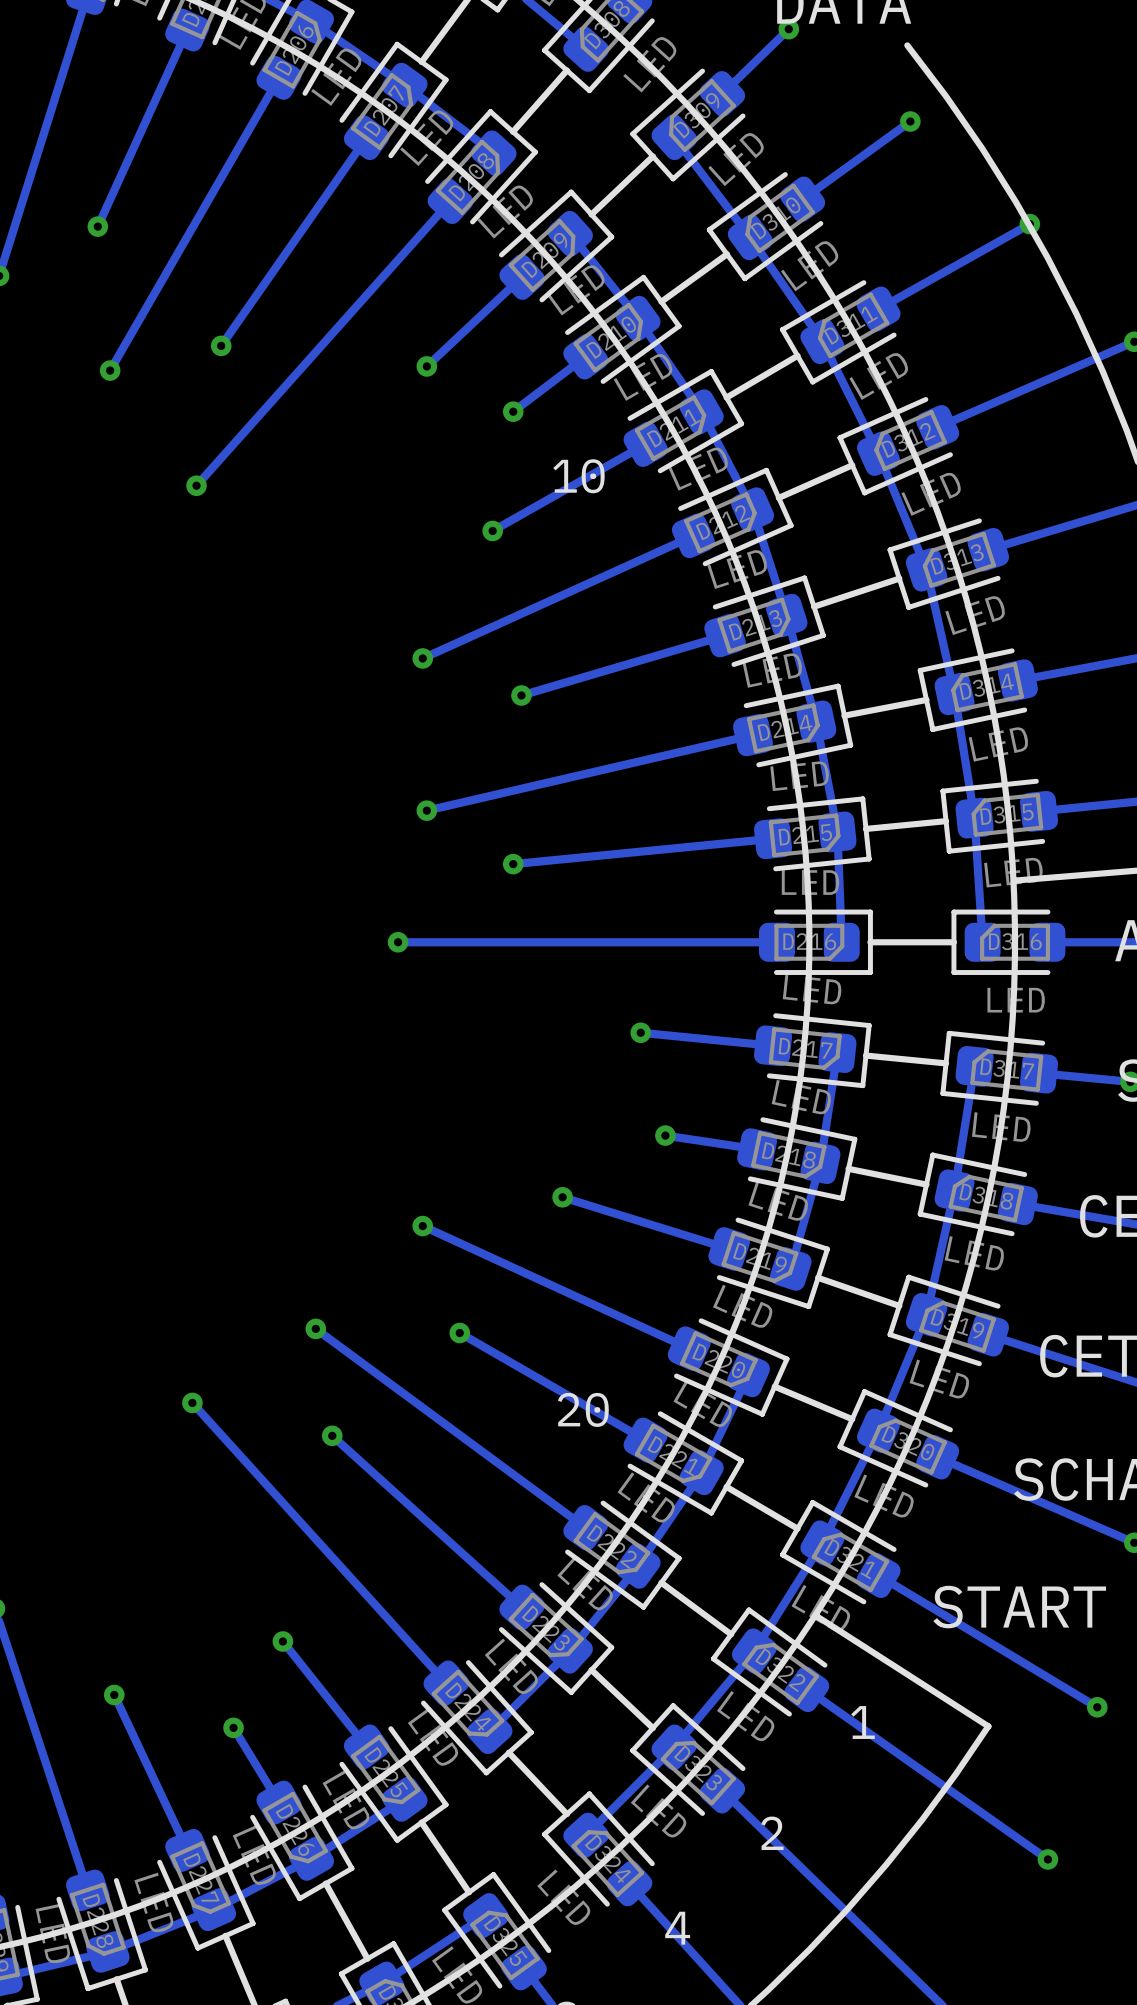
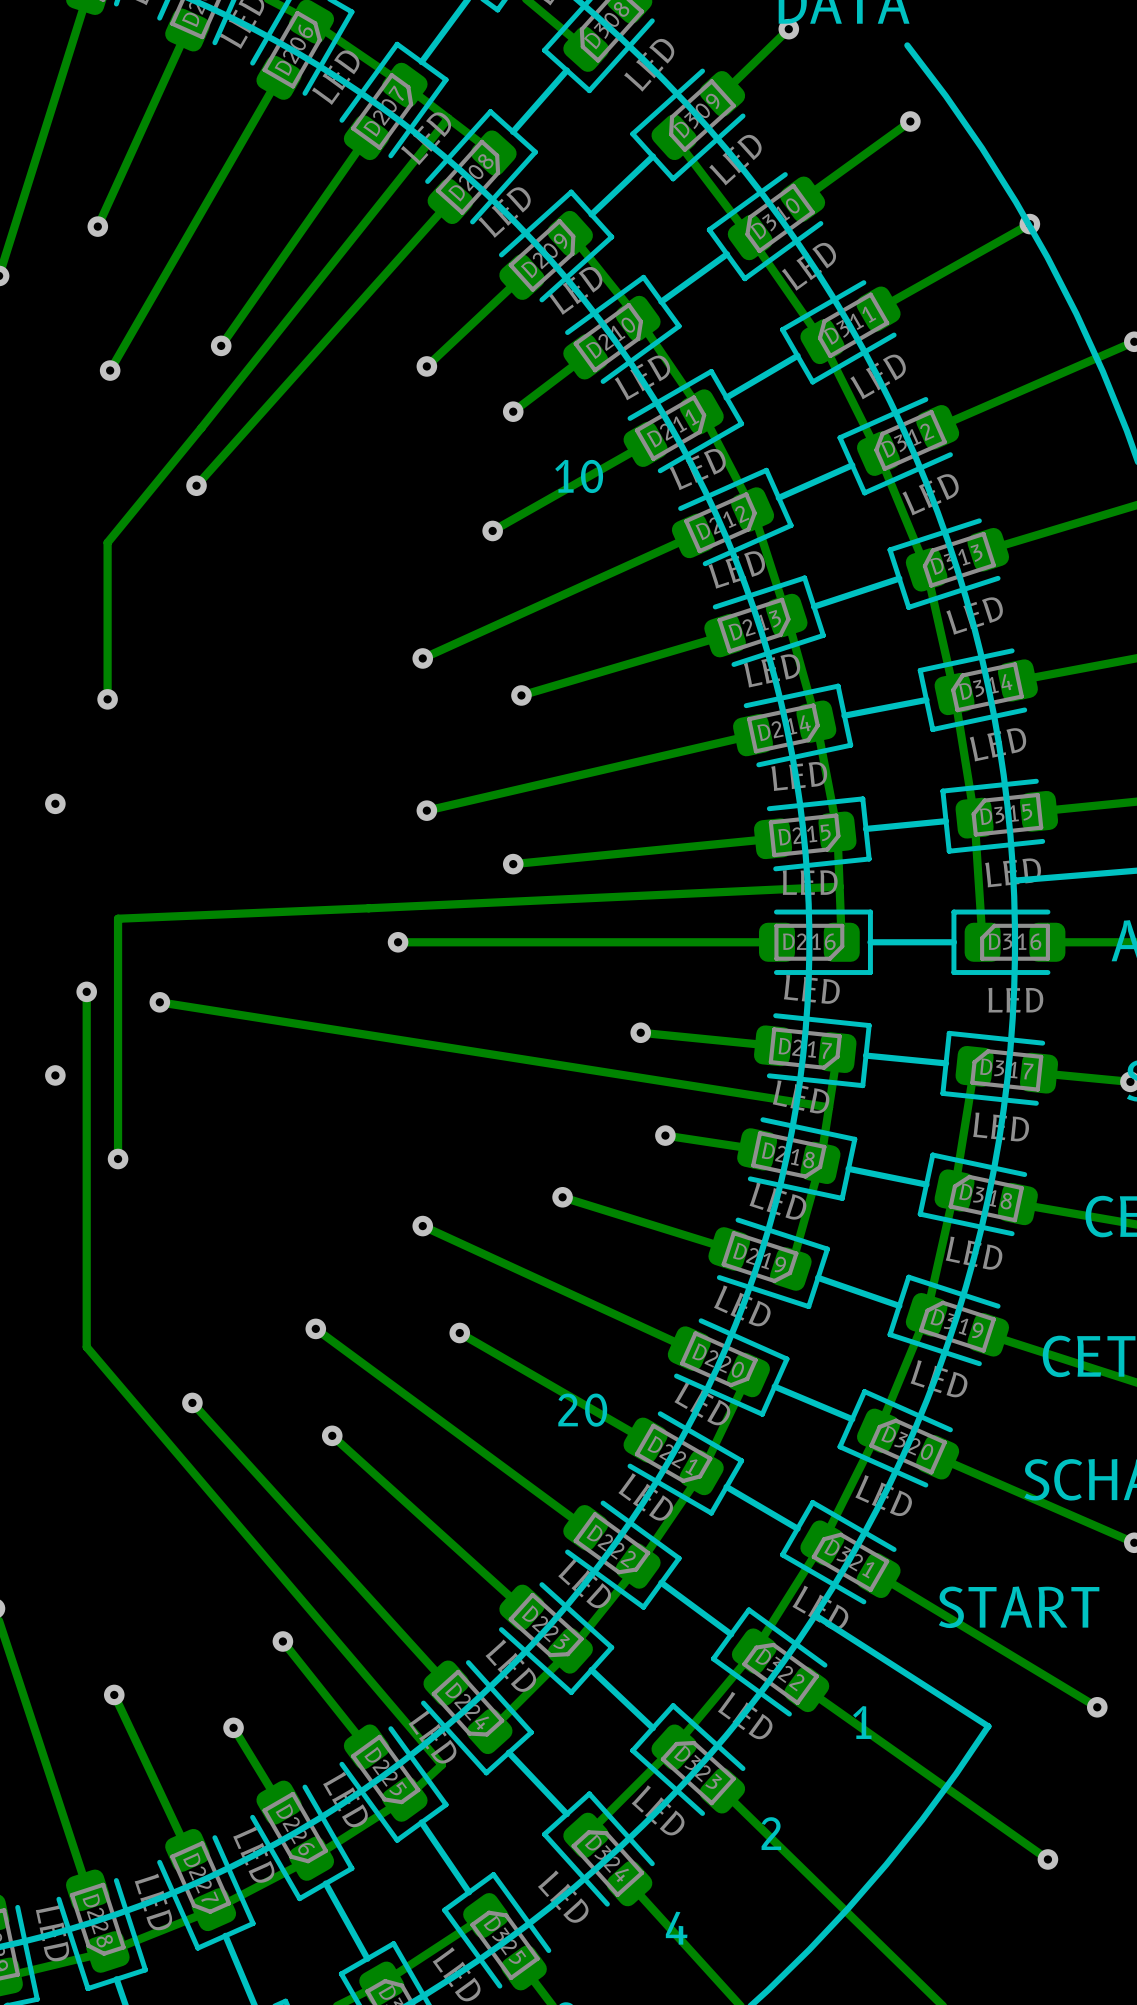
track: none -> (448, 118) (107, 542) (107, 699)
via: none -> (107, 699)
via: none -> (55, 803)
track: none -> (839, 886) (118, 918) (118, 1159)
track: none -> (86, 991) (86, 1347) (441, 1764) (404, 1799)
via: none -> (86, 991)
track: none -> (159, 1002) (829, 1107)
via: none -> (159, 1002)
via: none -> (55, 1075)
via: none -> (118, 1159)

